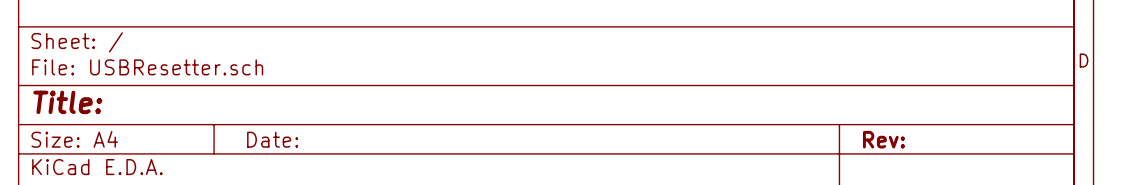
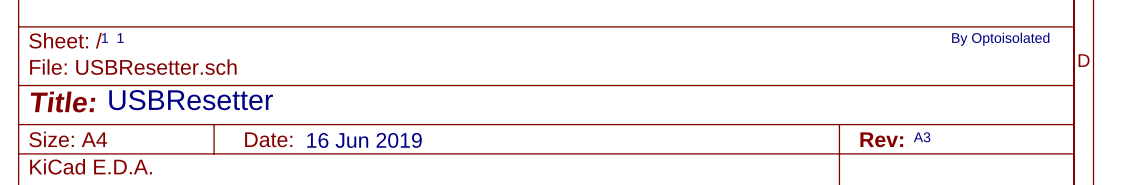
text: none -> 1 1 (112, 38)
text: none -> By Optoisolated (1000, 39)
text: none -> USBResetter (191, 100)
text: none -> A3 (922, 137)
text: none -> 16 Jun 2019 (364, 140)

